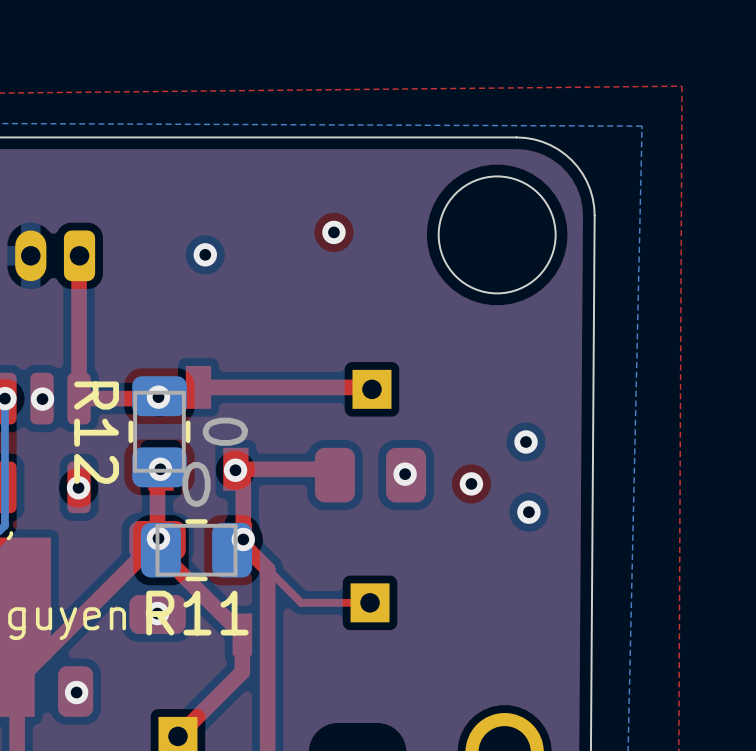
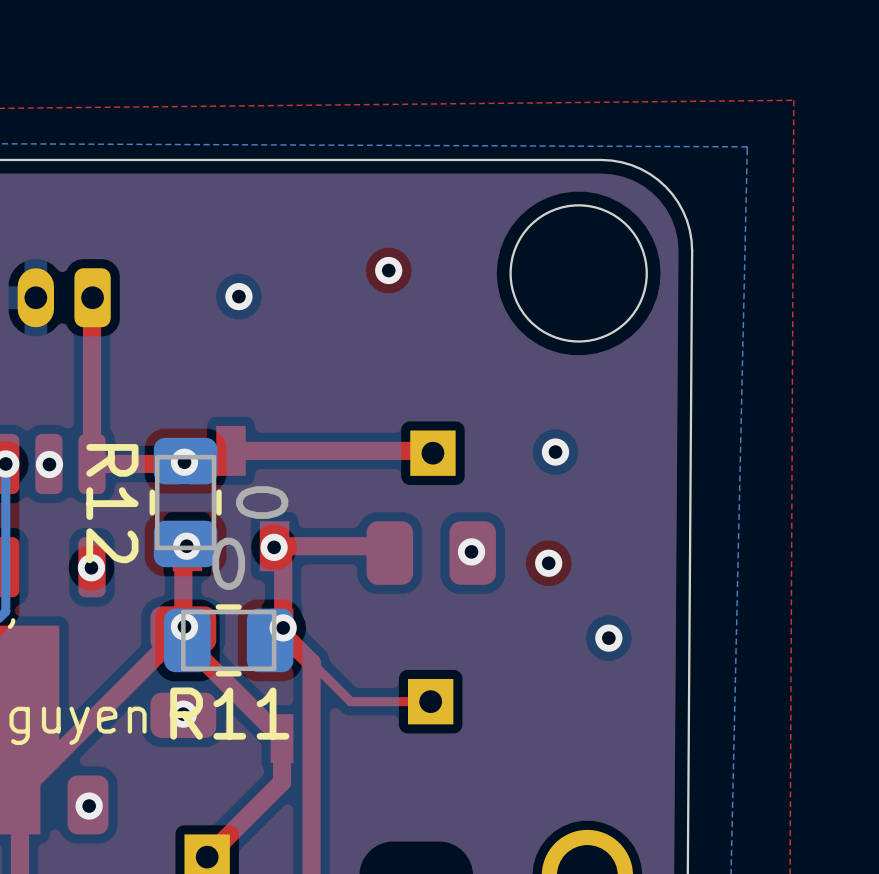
via: none -> (555, 452)
via: (526, 441) -> none
via position: (528, 512) -> (608, 638)

